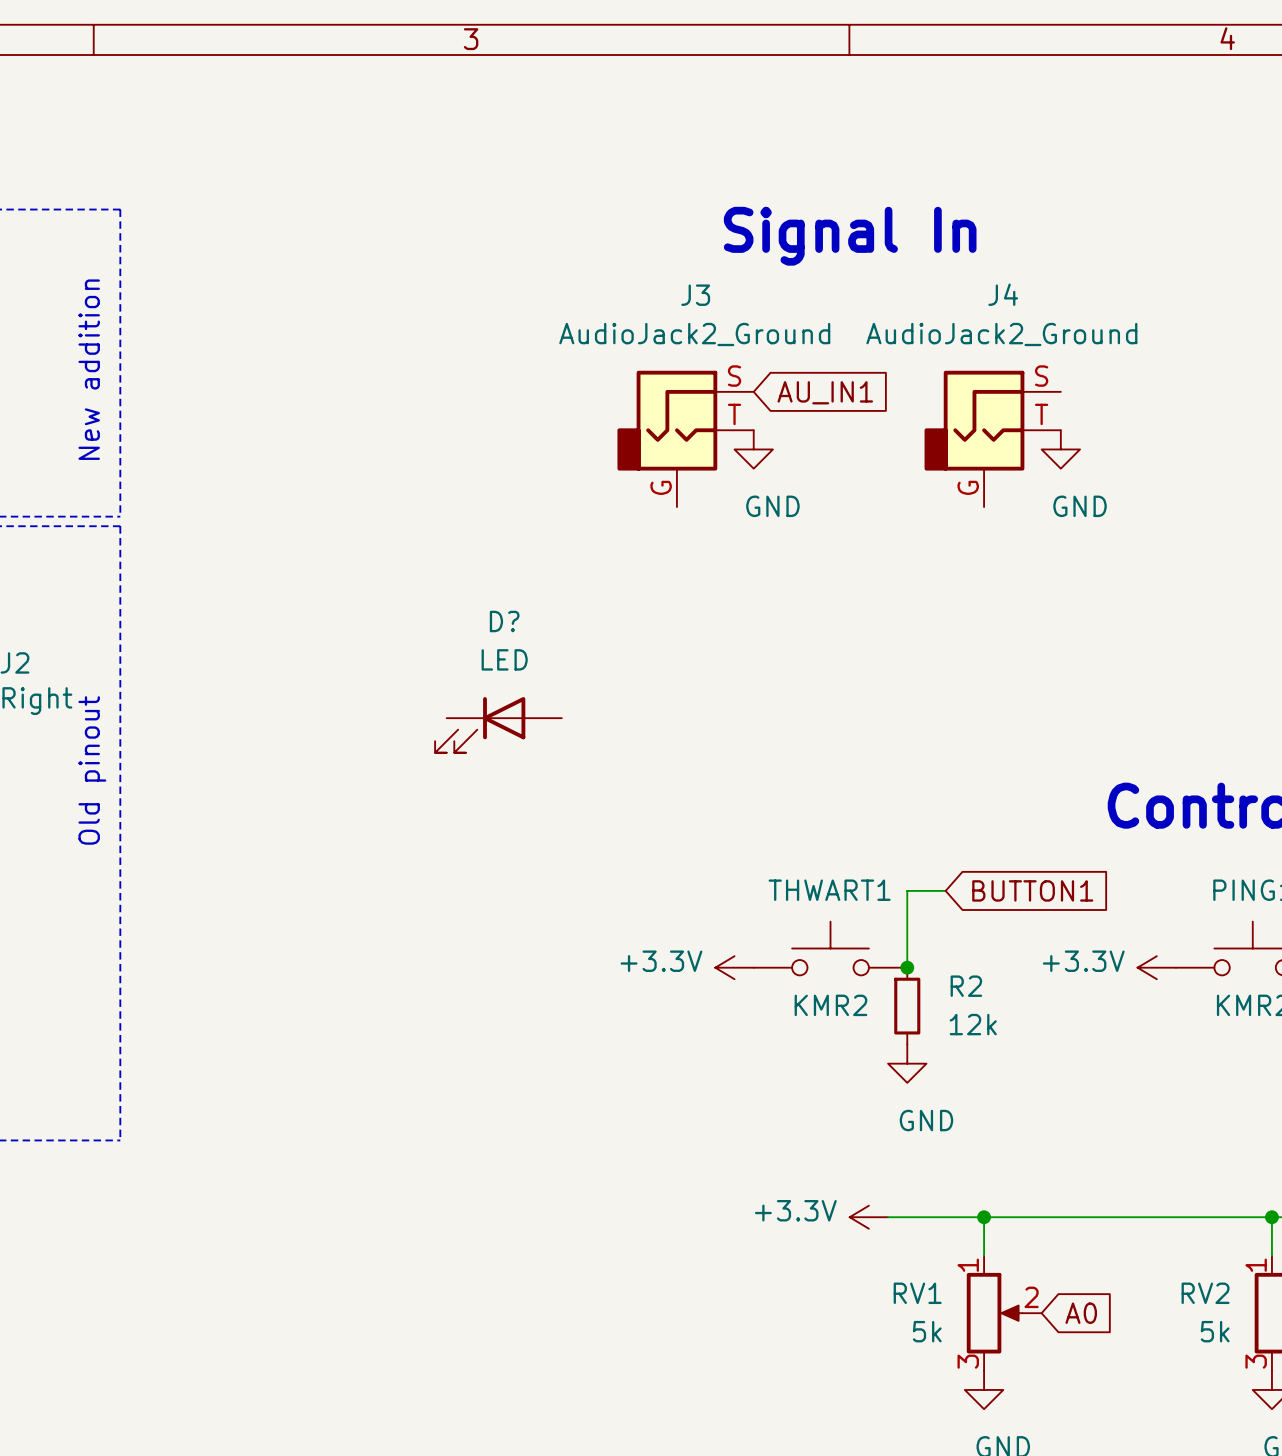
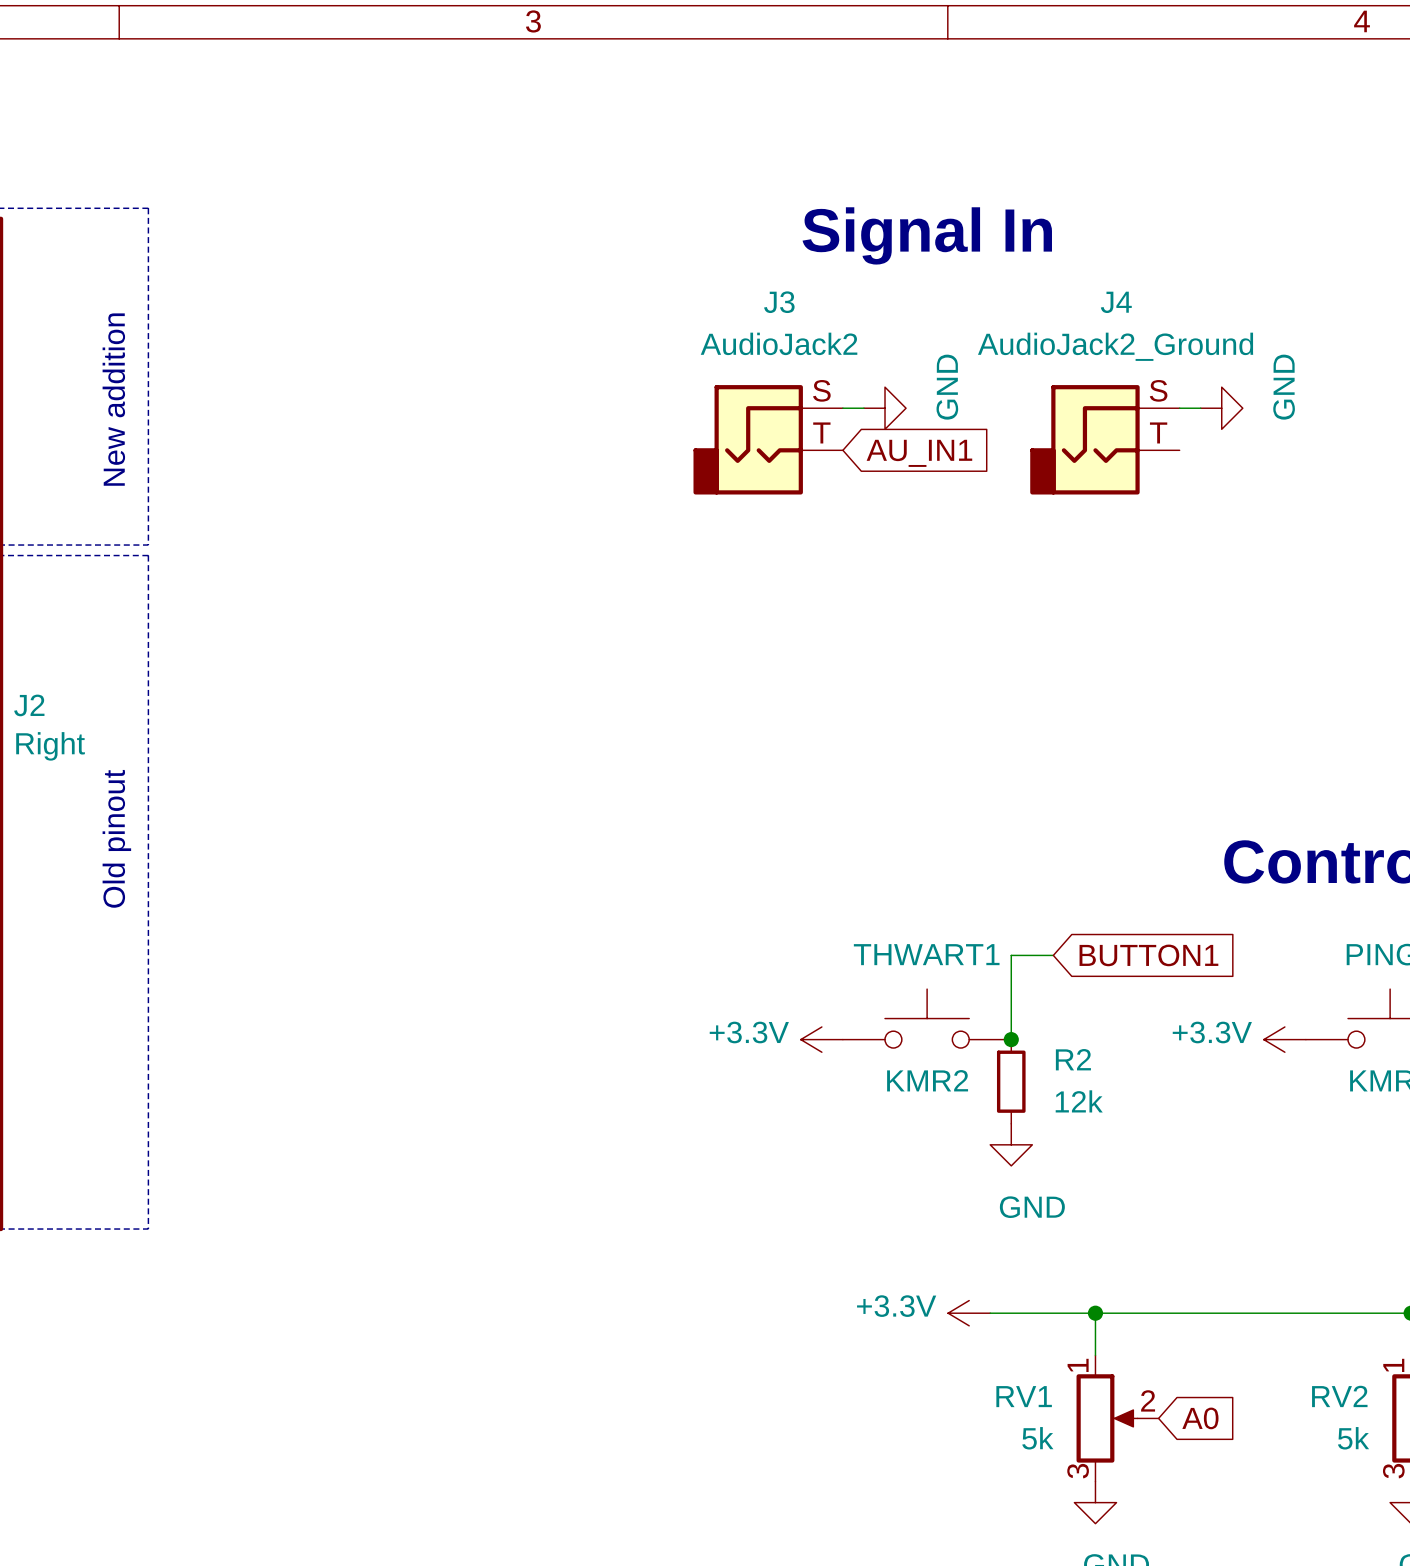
J3 value: AudioJack2_Ground (694, 334) -> AudioJack2 (779, 343)
J3 symbol: [617, 370, 754, 508] -> [693, 385, 843, 495]
J4 symbol: [924, 370, 1061, 508] -> [1030, 385, 1180, 495]
wire: none -> (842, 408) (863, 408)
wire: none -> (1179, 408) (1200, 408)
global label position: AU_IN1 (825, 392) -> AU_IN1 (919, 453)
power symbol rotation: 0° (753, 449) -> 90° counterclockwise (885, 408)
power symbol position: GND (753, 449) -> GND (885, 408)
power symbol rotation: 0° (1060, 449) -> 90° counterclockwise (1221, 408)
power symbol position: GND (1060, 449) -> GND (1221, 408)
D?: LED (498, 724) -> none

